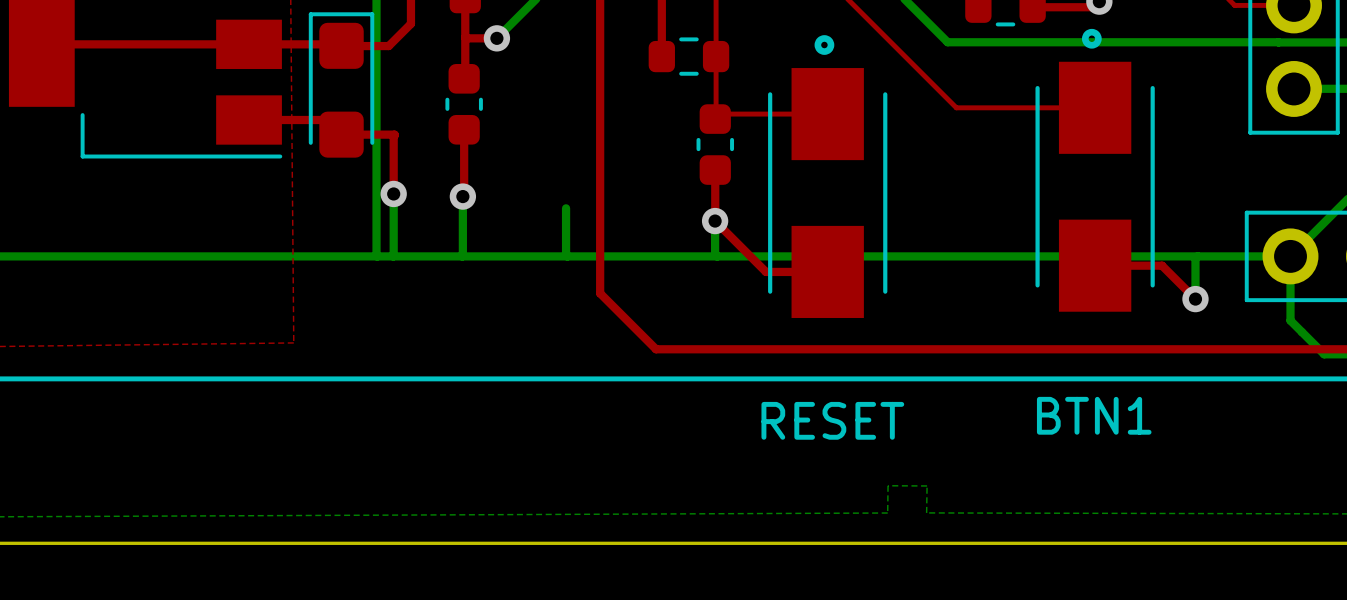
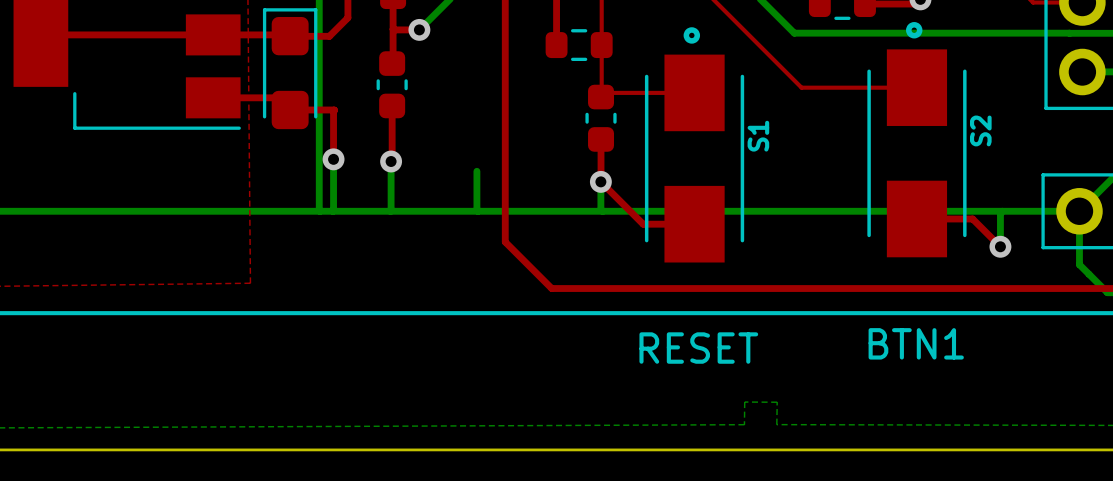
S2 name: none -> S2 (980, 130)
S1 name: none -> S1 (758, 136)

